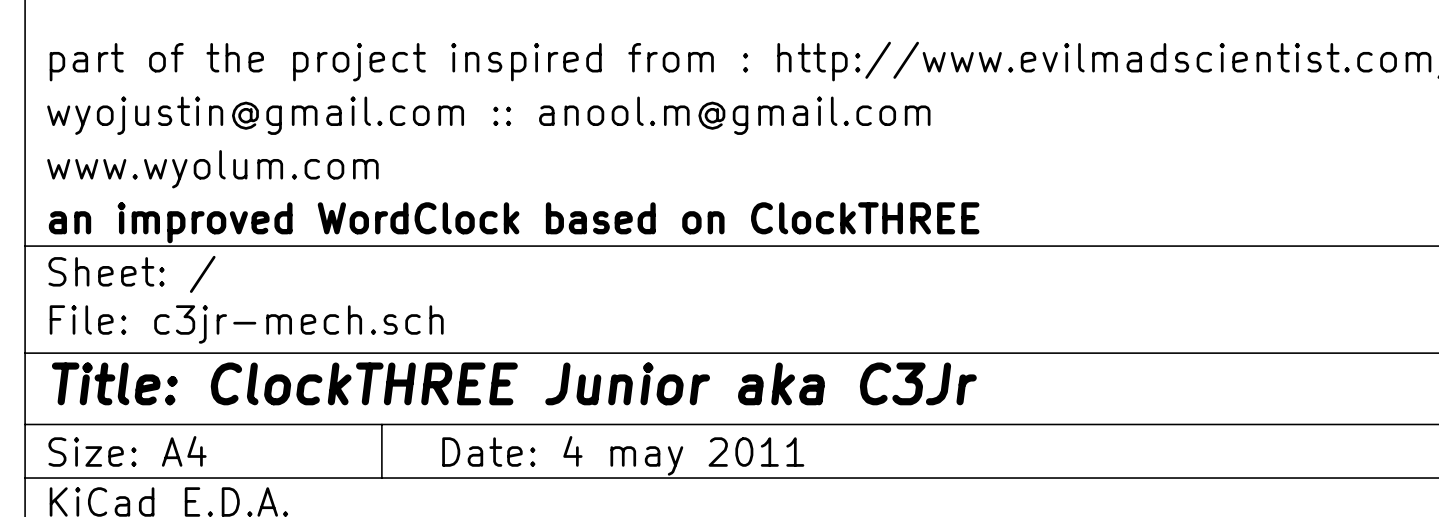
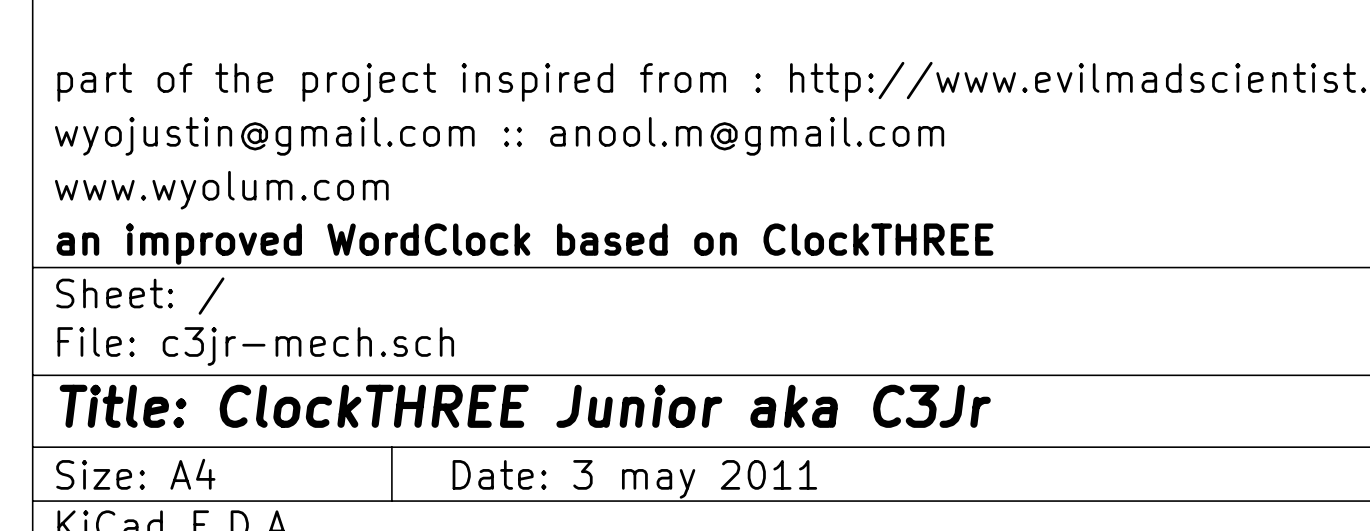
title block: Date: 4 may 2011 (623, 455) -> Date: 3 may 2011 (634, 479)

